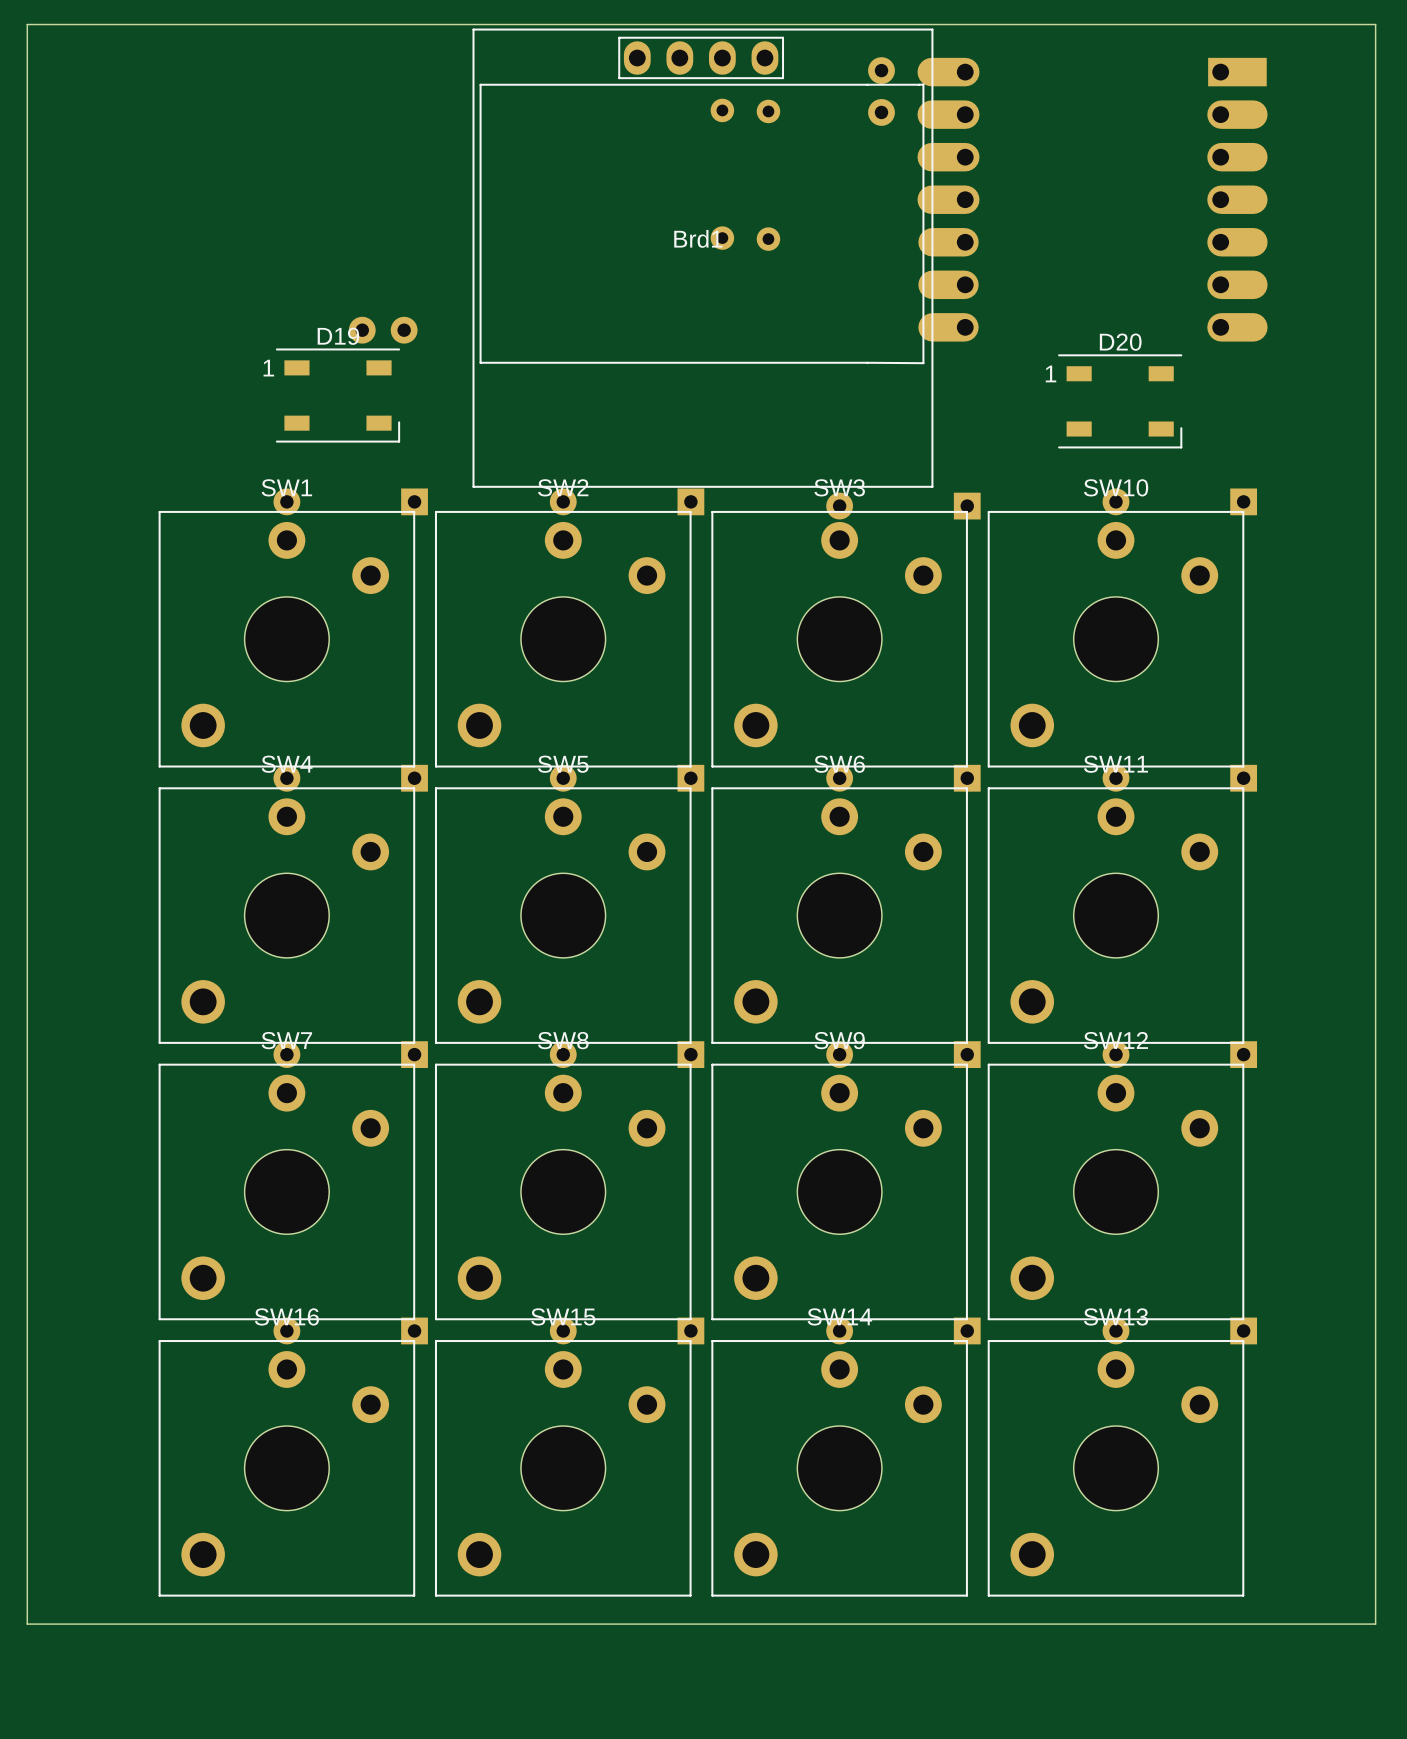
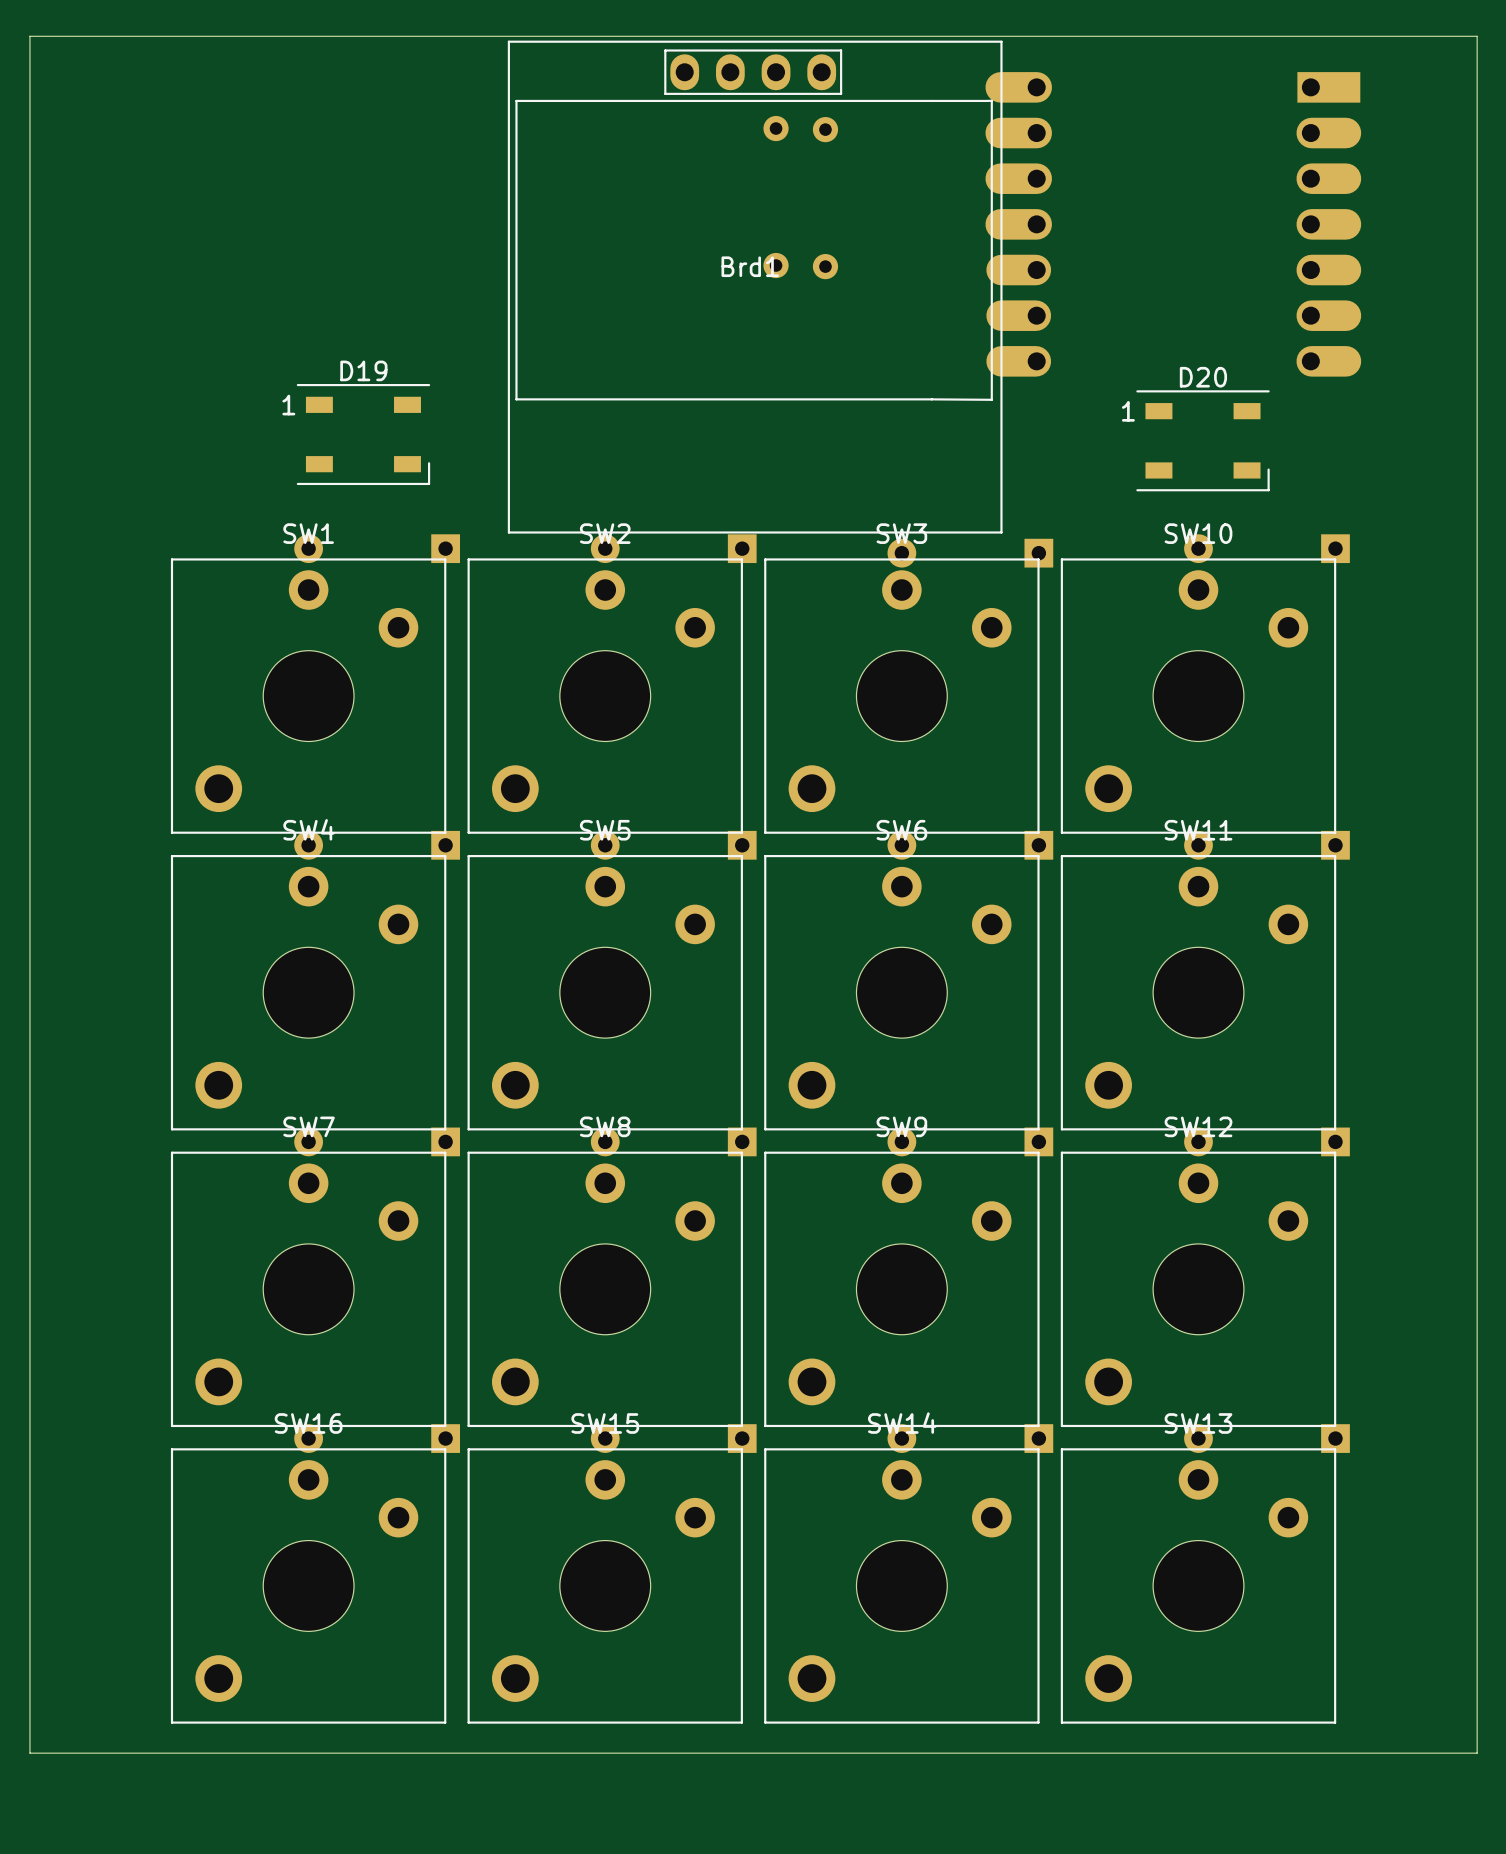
part: (881, 91) -> none
part: (383, 330) -> none

